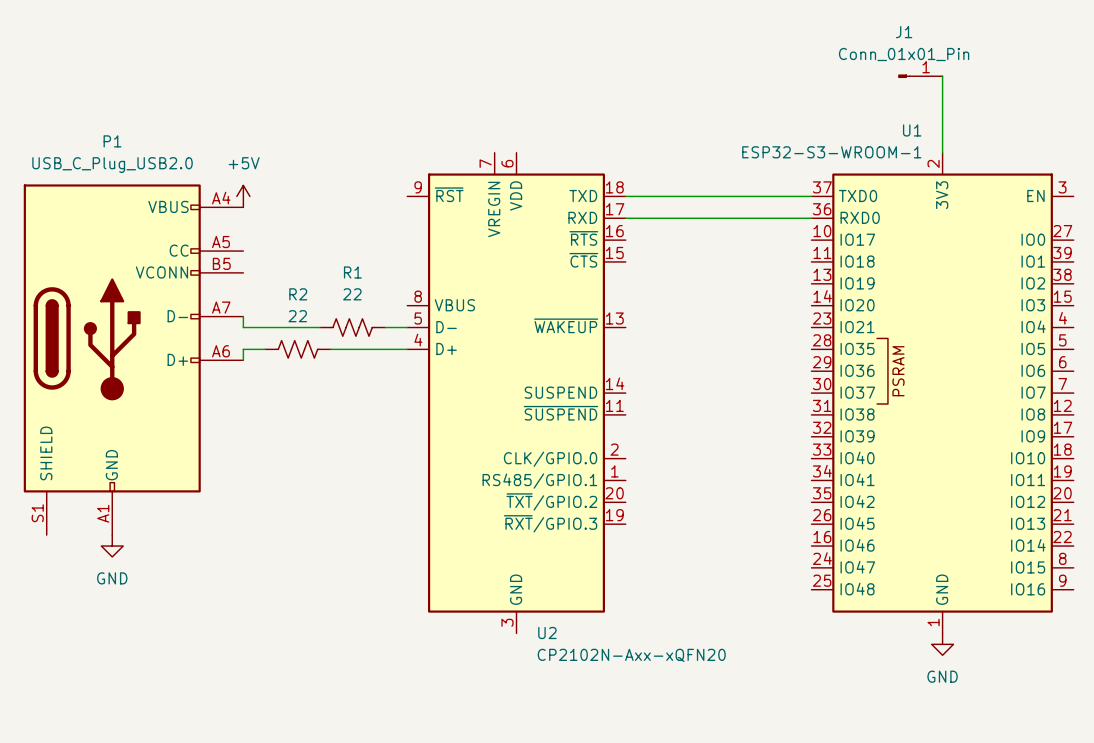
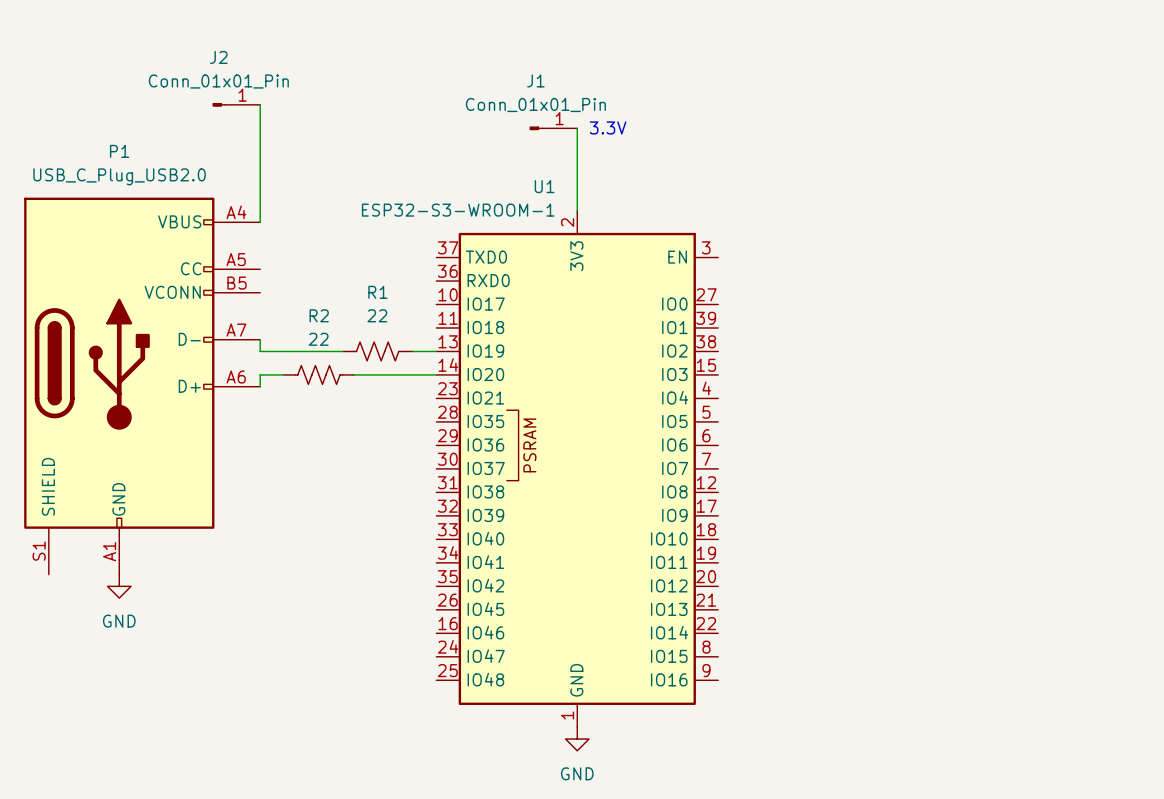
J1 position: (920, 76) -> (553, 128)
wire: (942, 76) (942, 152) -> none
J2: none -> Conn_01x01_Pin (236, 104)
wire: none -> (260, 104) (260, 222)
wire: none -> (577, 128) (577, 210)
text: none -> 3.3V (608, 127)
power symbol: +5V (243, 196) -> none
wire: (625, 196) (811, 196) -> none
wire: (625, 218) (811, 218) -> none
U2: CP2102N-Axx-xQFN20 (516, 393) -> none
U1 position: (942, 393) -> (577, 468)
power symbol: GND (942, 644) -> none
power symbol: none -> GND (577, 739)

